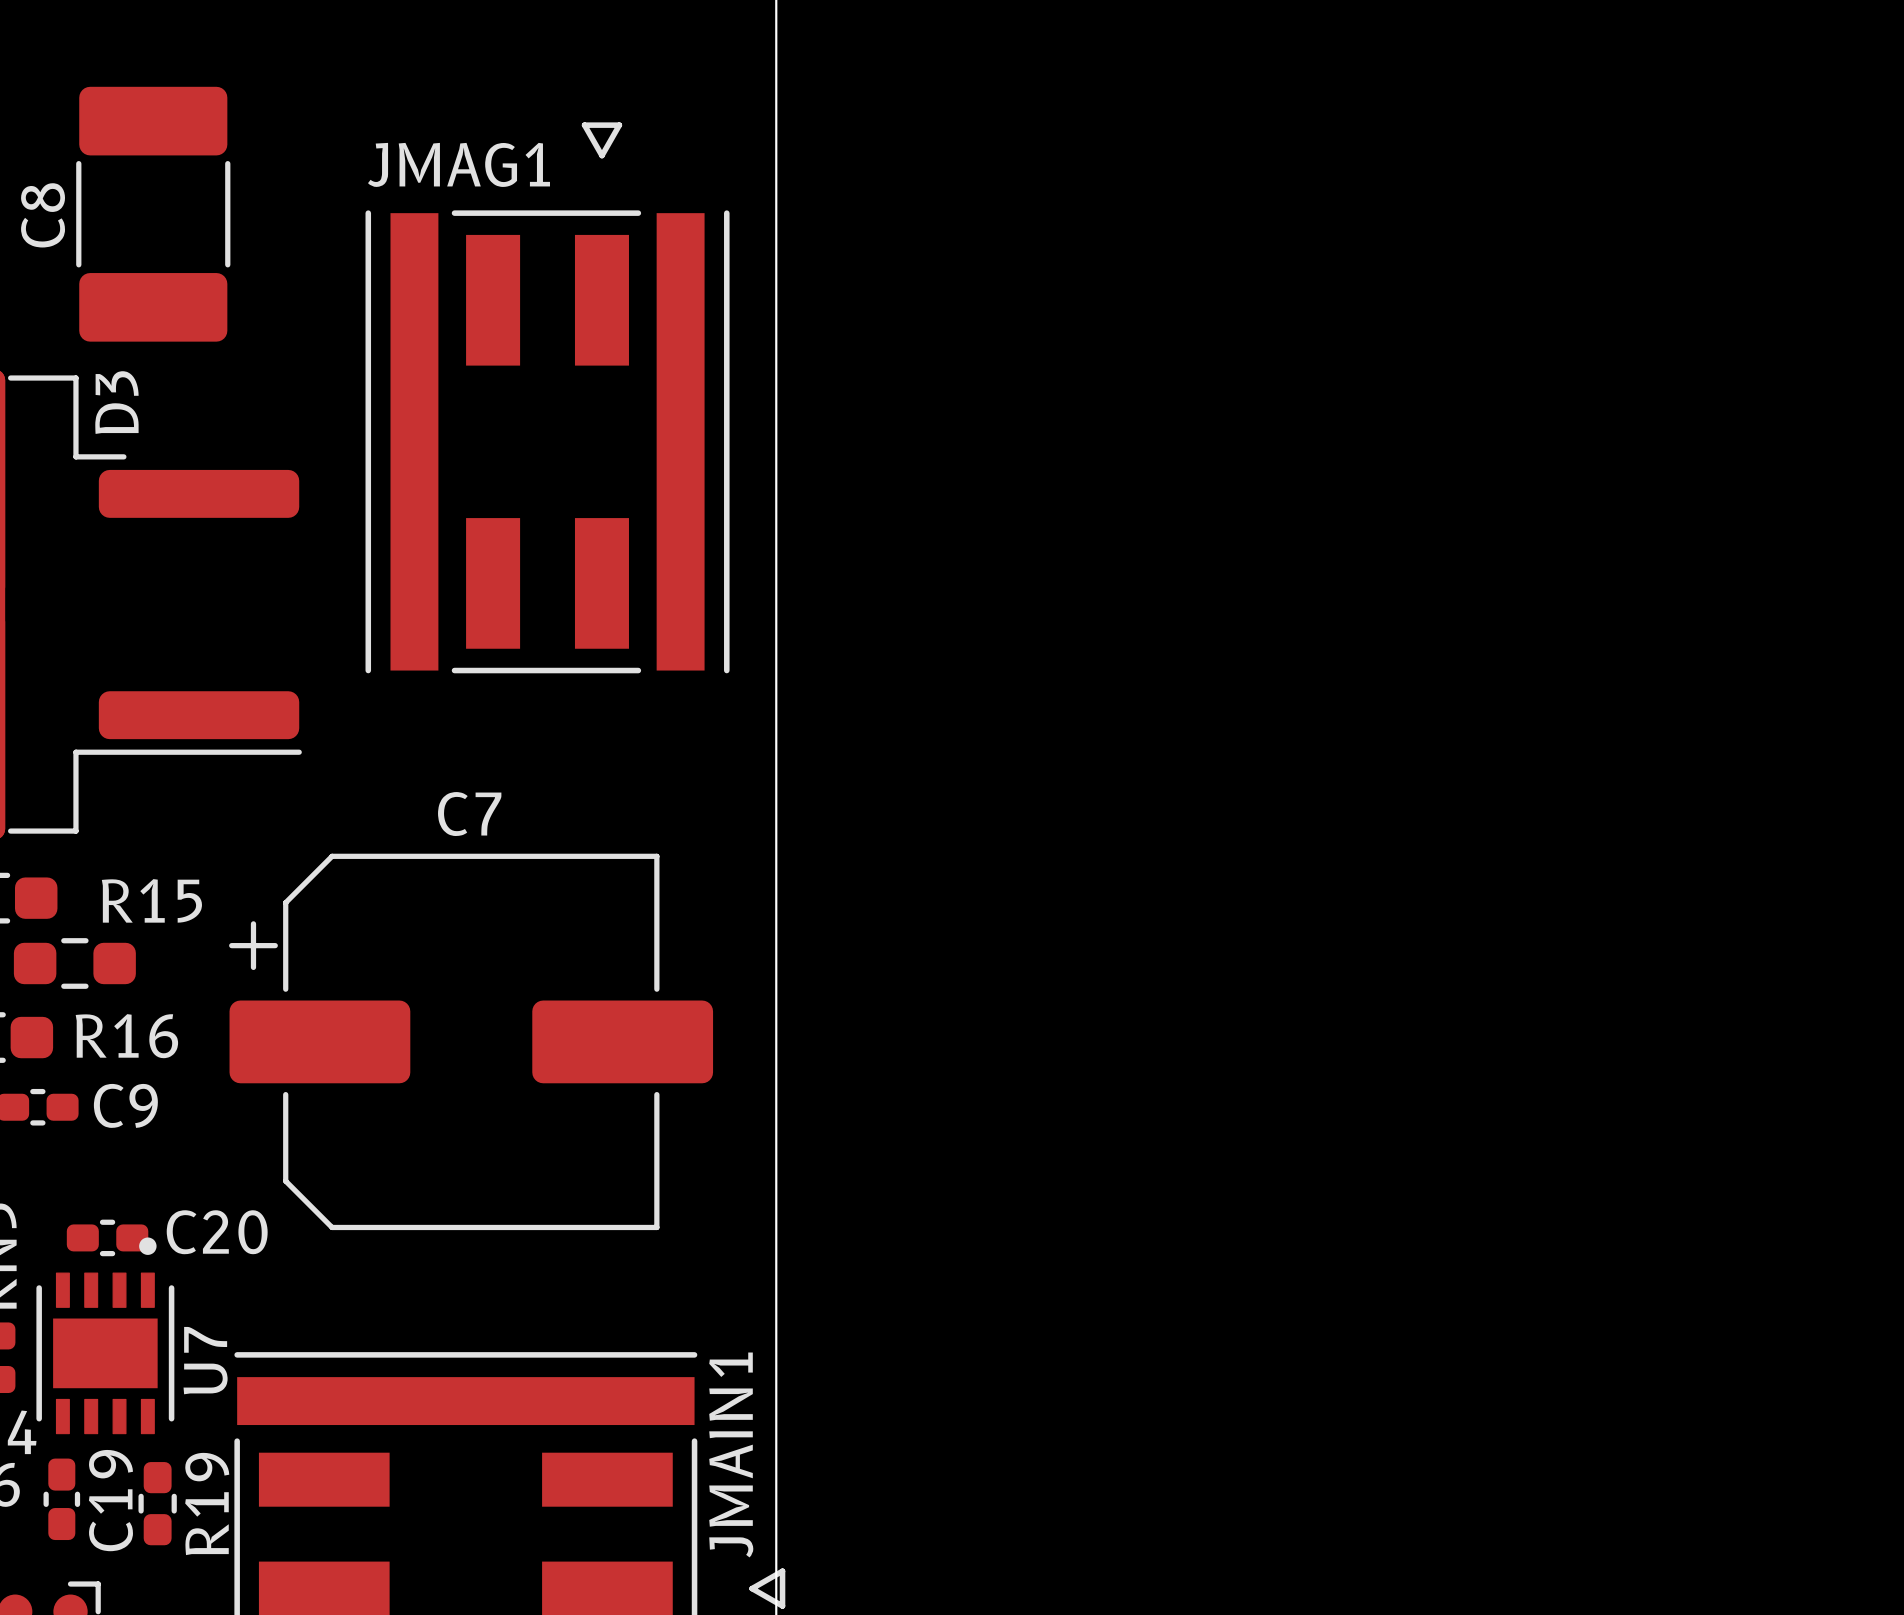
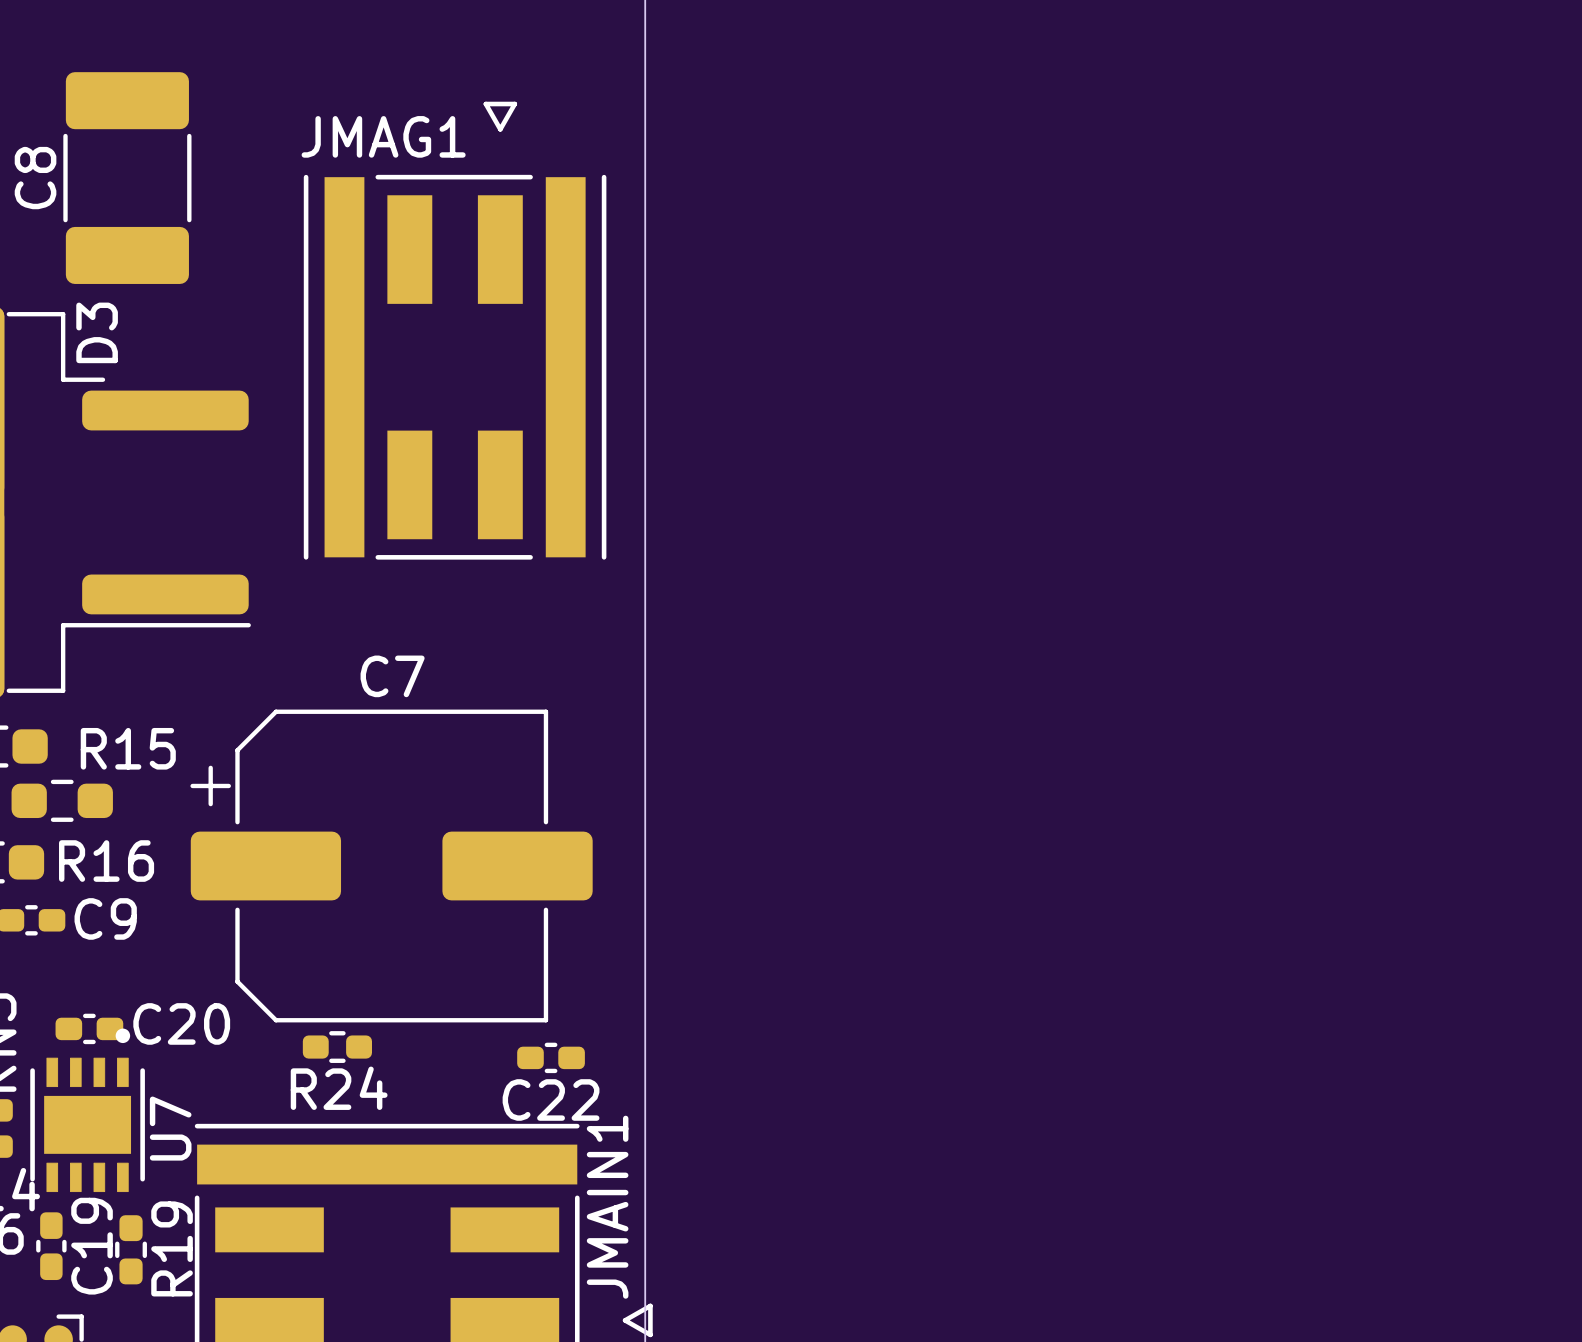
R24: none -> (337, 1047)
C22: none -> (551, 1057)

